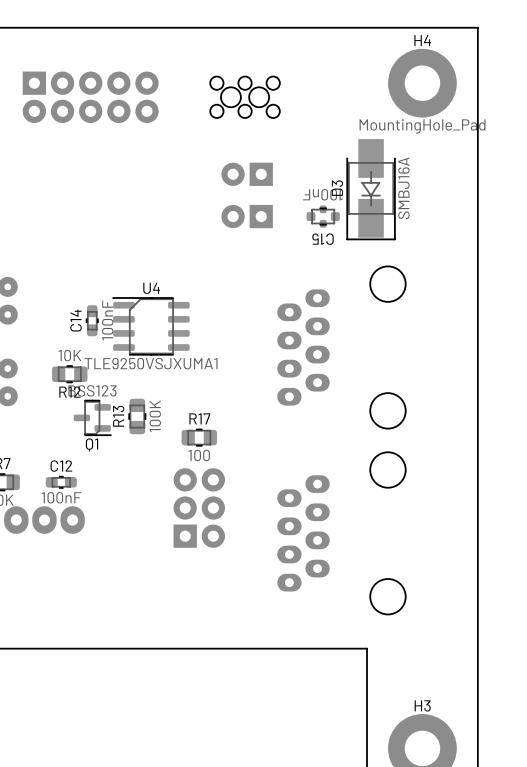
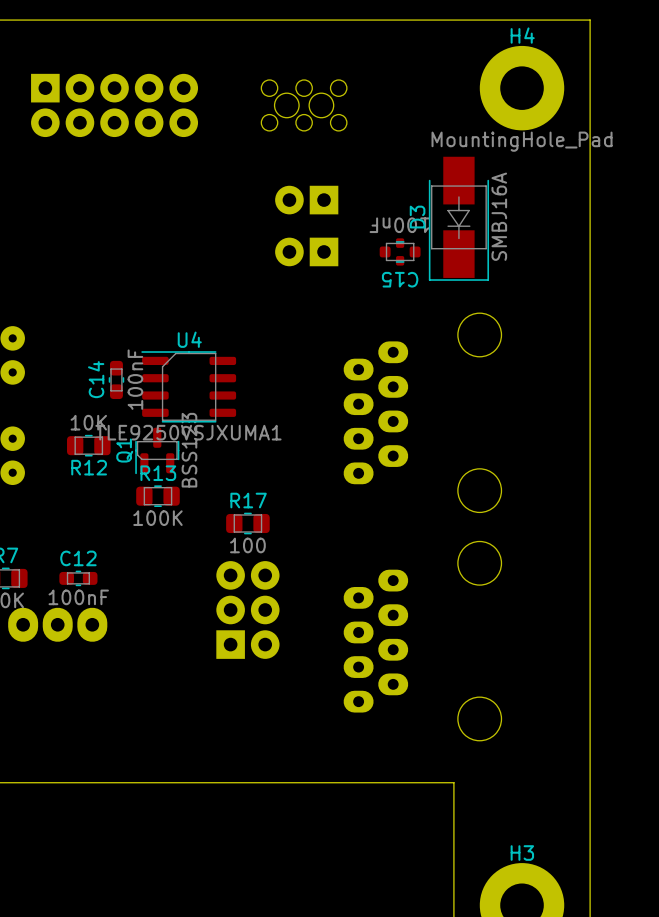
R13 rotation: 0° (137, 416) -> 90° clockwise (157, 496)
Q1 rotation: 0° (92, 417) -> 90° clockwise (157, 450)
Q1 position: (92, 417) -> (157, 450)

